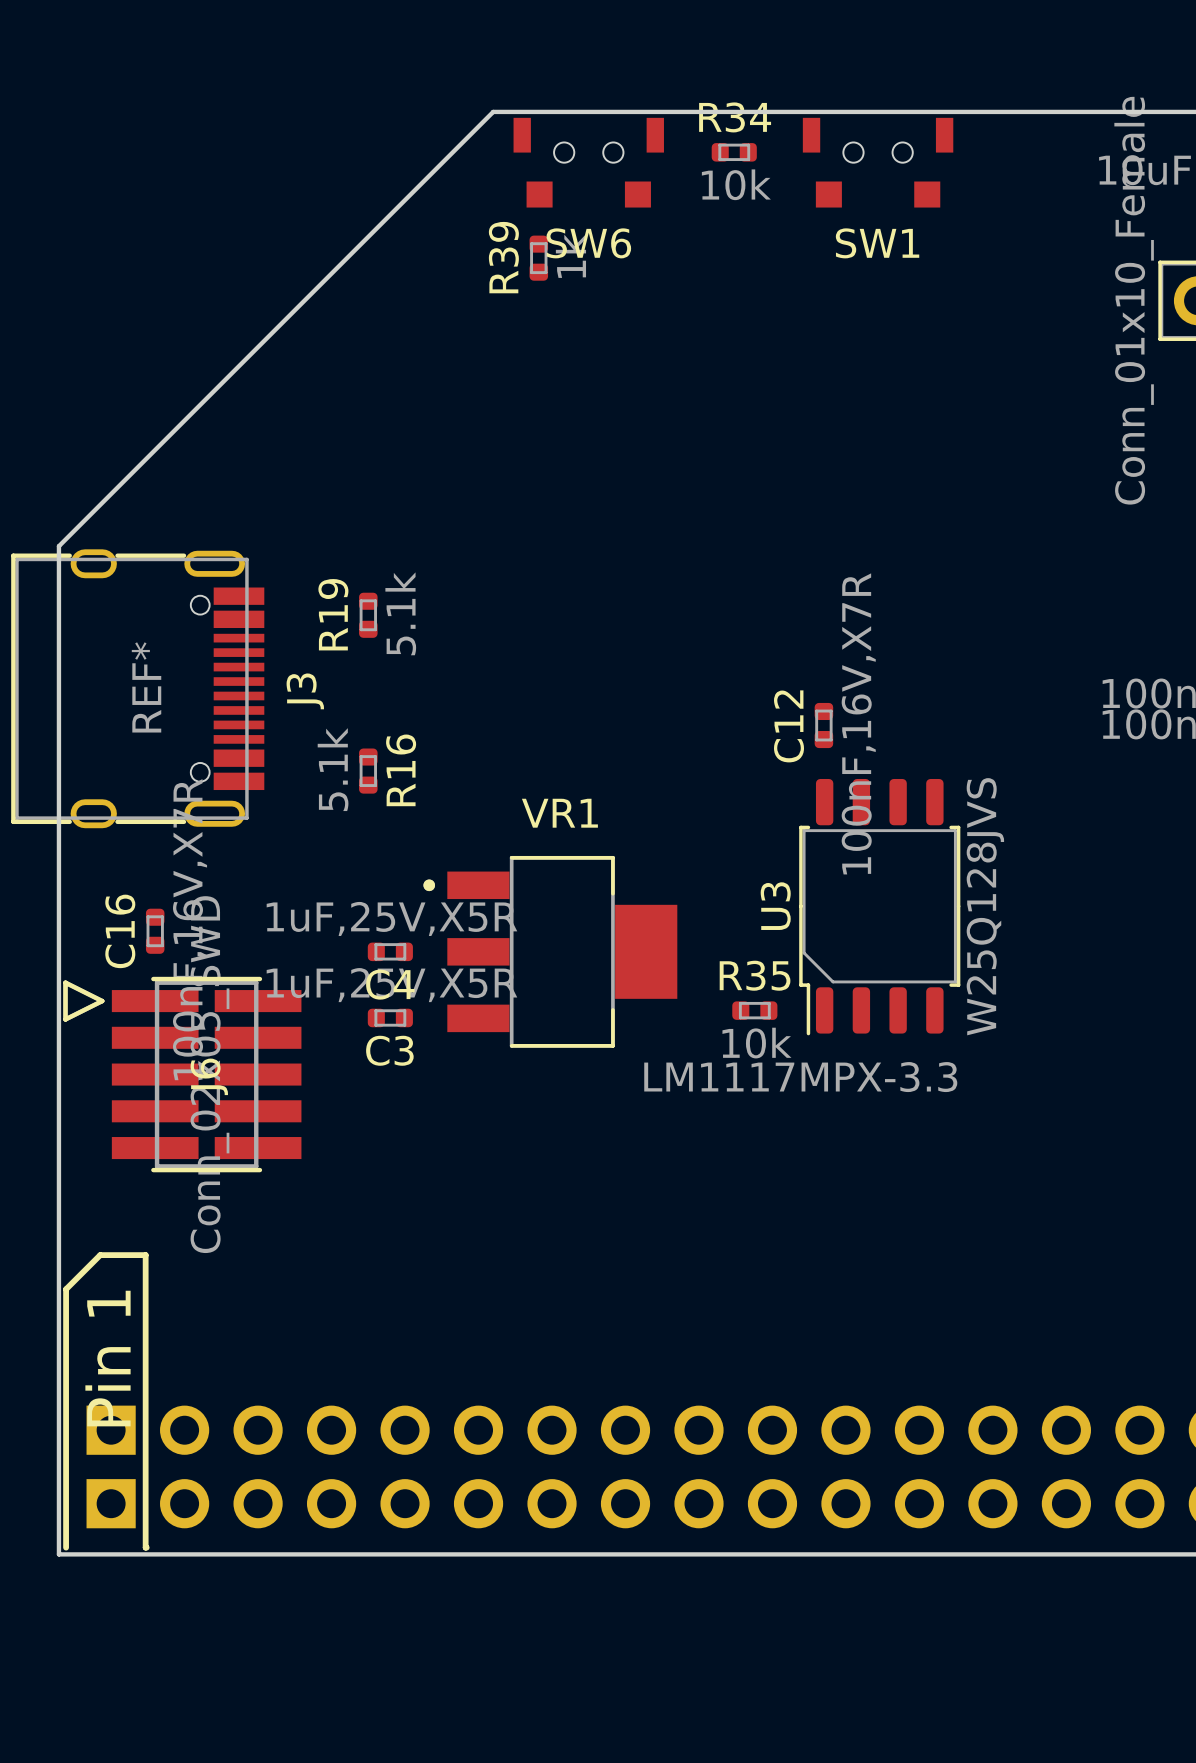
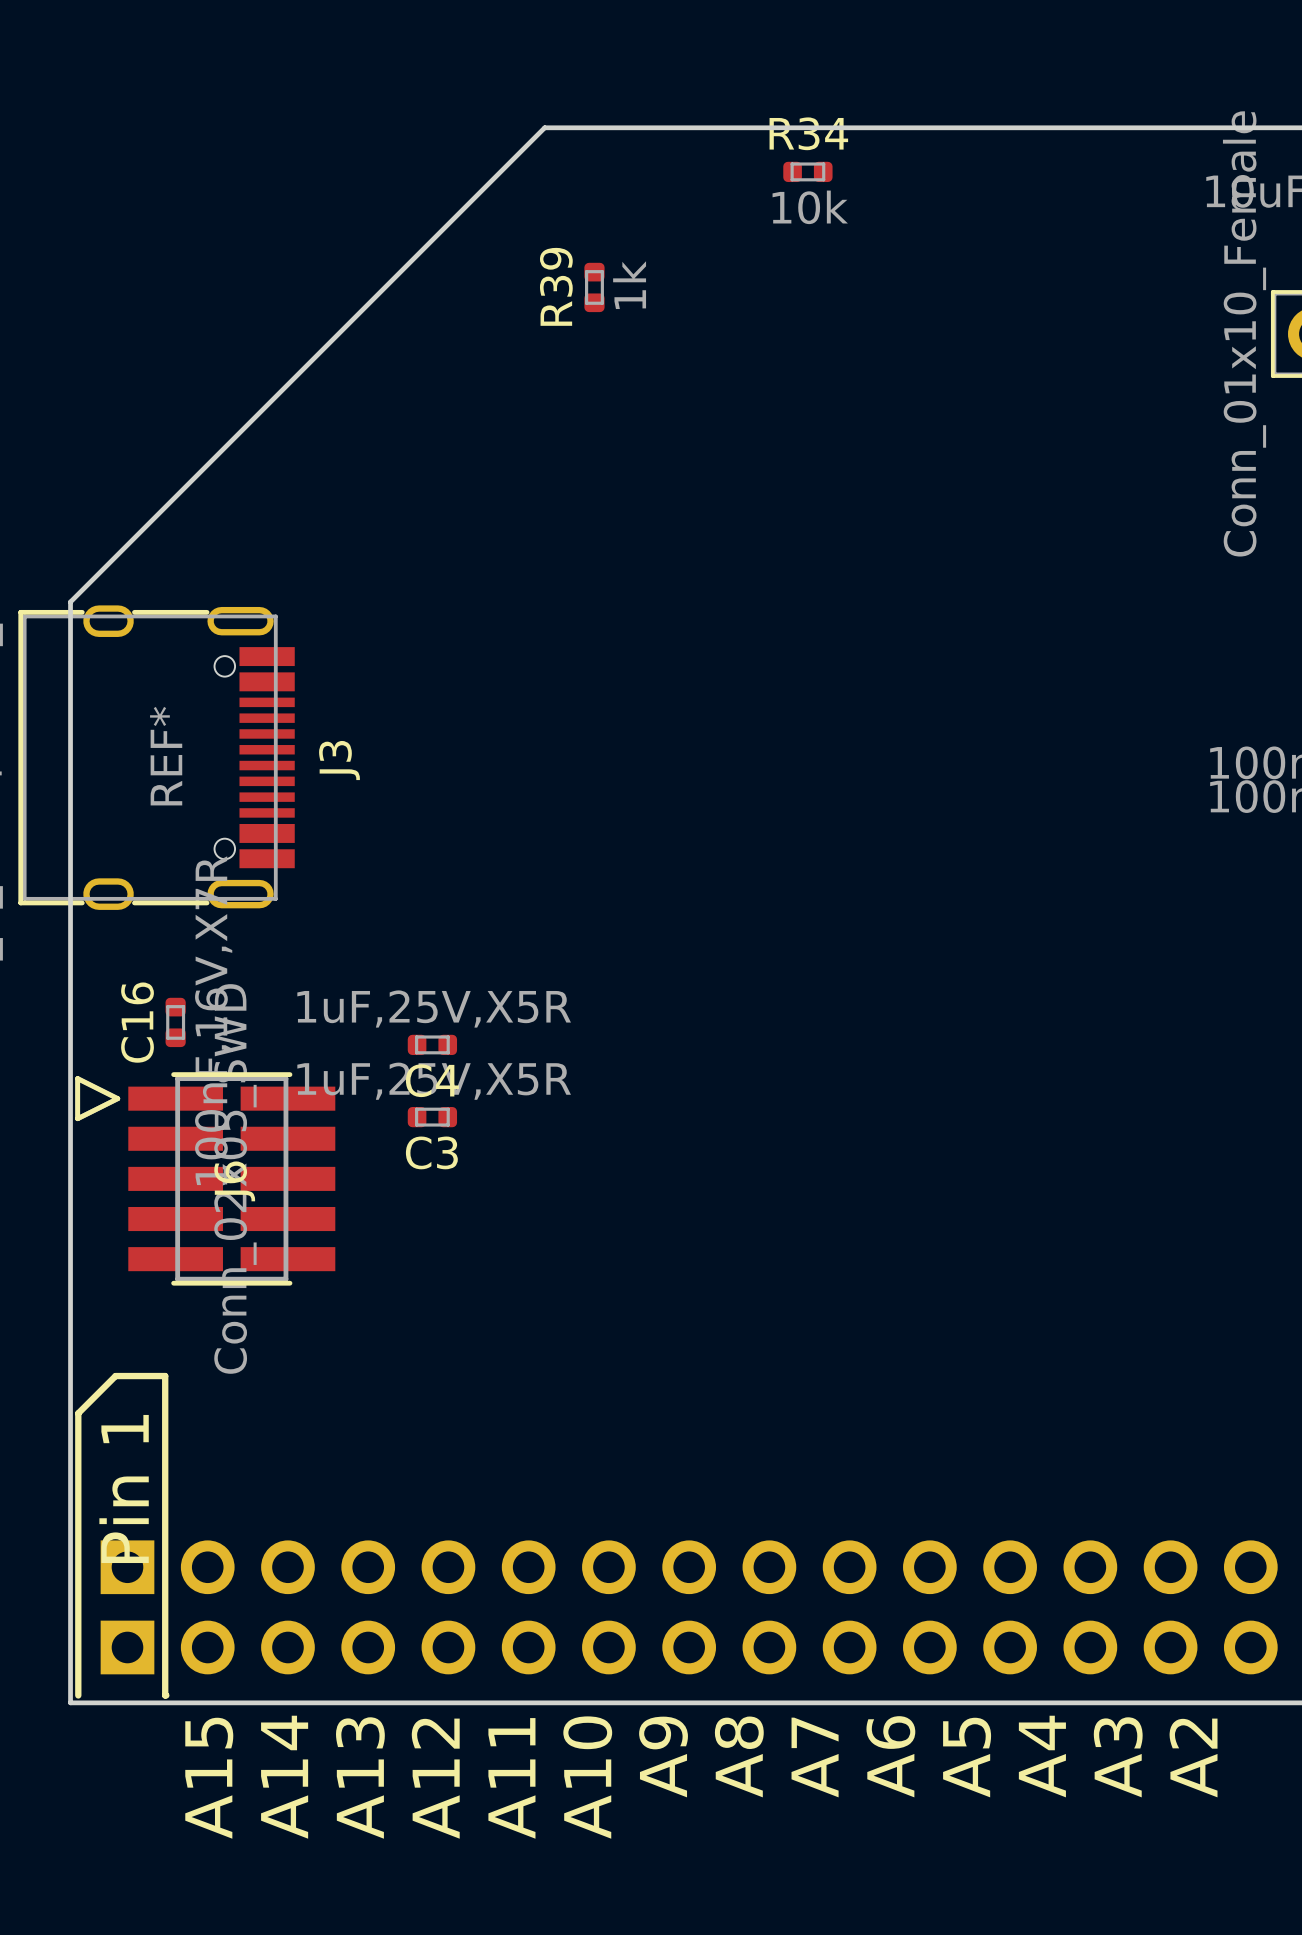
SW6: (588, 162) -> none
SW1: (878, 162) -> none
R19: 5.1k (368, 615) -> none
C12: 100nF,16V,X7R (823, 725) -> none
R16: 5.1k (368, 771) -> none
U3: W25Q128JVS (879, 907) -> none
VR1: LM1117MPX-3.3 (550, 951) -> none
R35: 10k (754, 1010) -> none
text: none -> A8 (739, 1756)
text: none -> A6 (890, 1756)
text: none -> A4 (1042, 1756)
text: none -> A9 (663, 1757)
text: none -> A7 (815, 1757)
text: none -> A5 (967, 1757)
text: none -> A3 (1118, 1757)
text: none -> A2 (1193, 1757)
text: none -> A14 (284, 1777)
text: none -> A10 (587, 1777)
text: none -> A15 (209, 1778)
text: none -> A13 (360, 1778)
text: none -> A12 (435, 1778)
text: none -> A11 (511, 1778)

